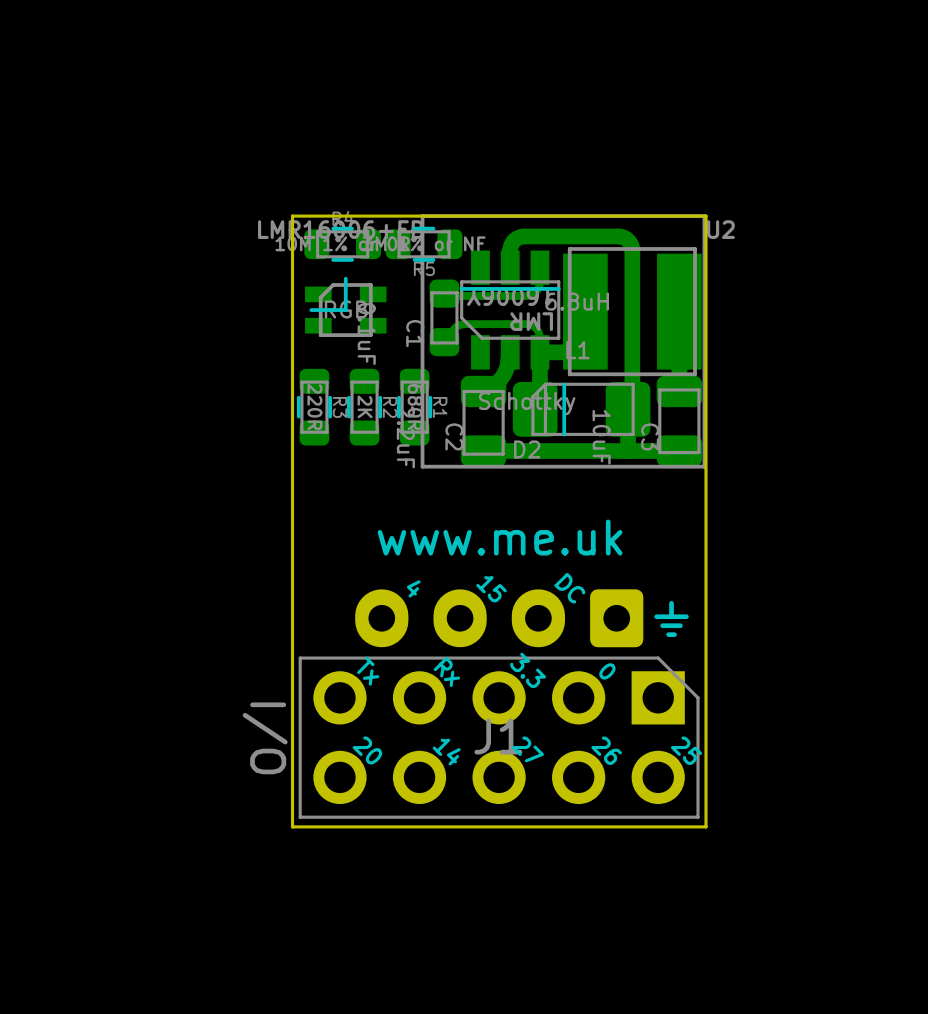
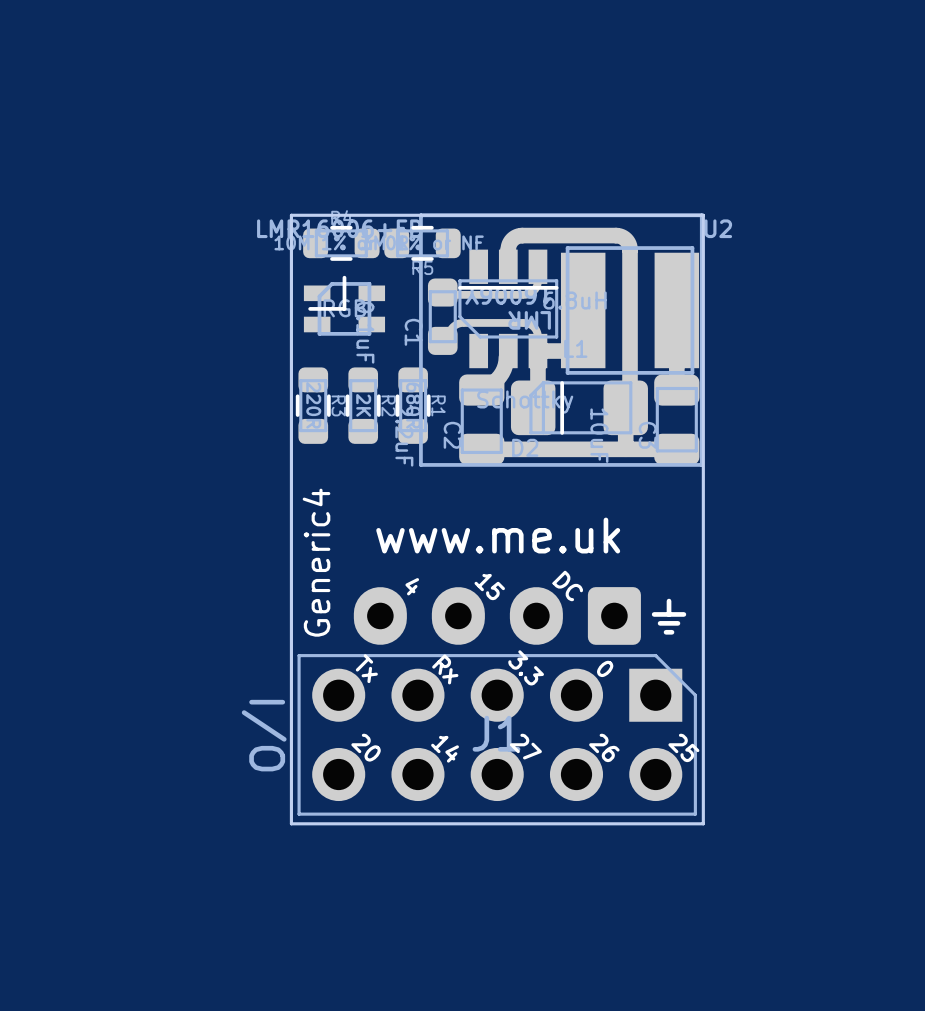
text: none -> Generic4 (316, 562)

